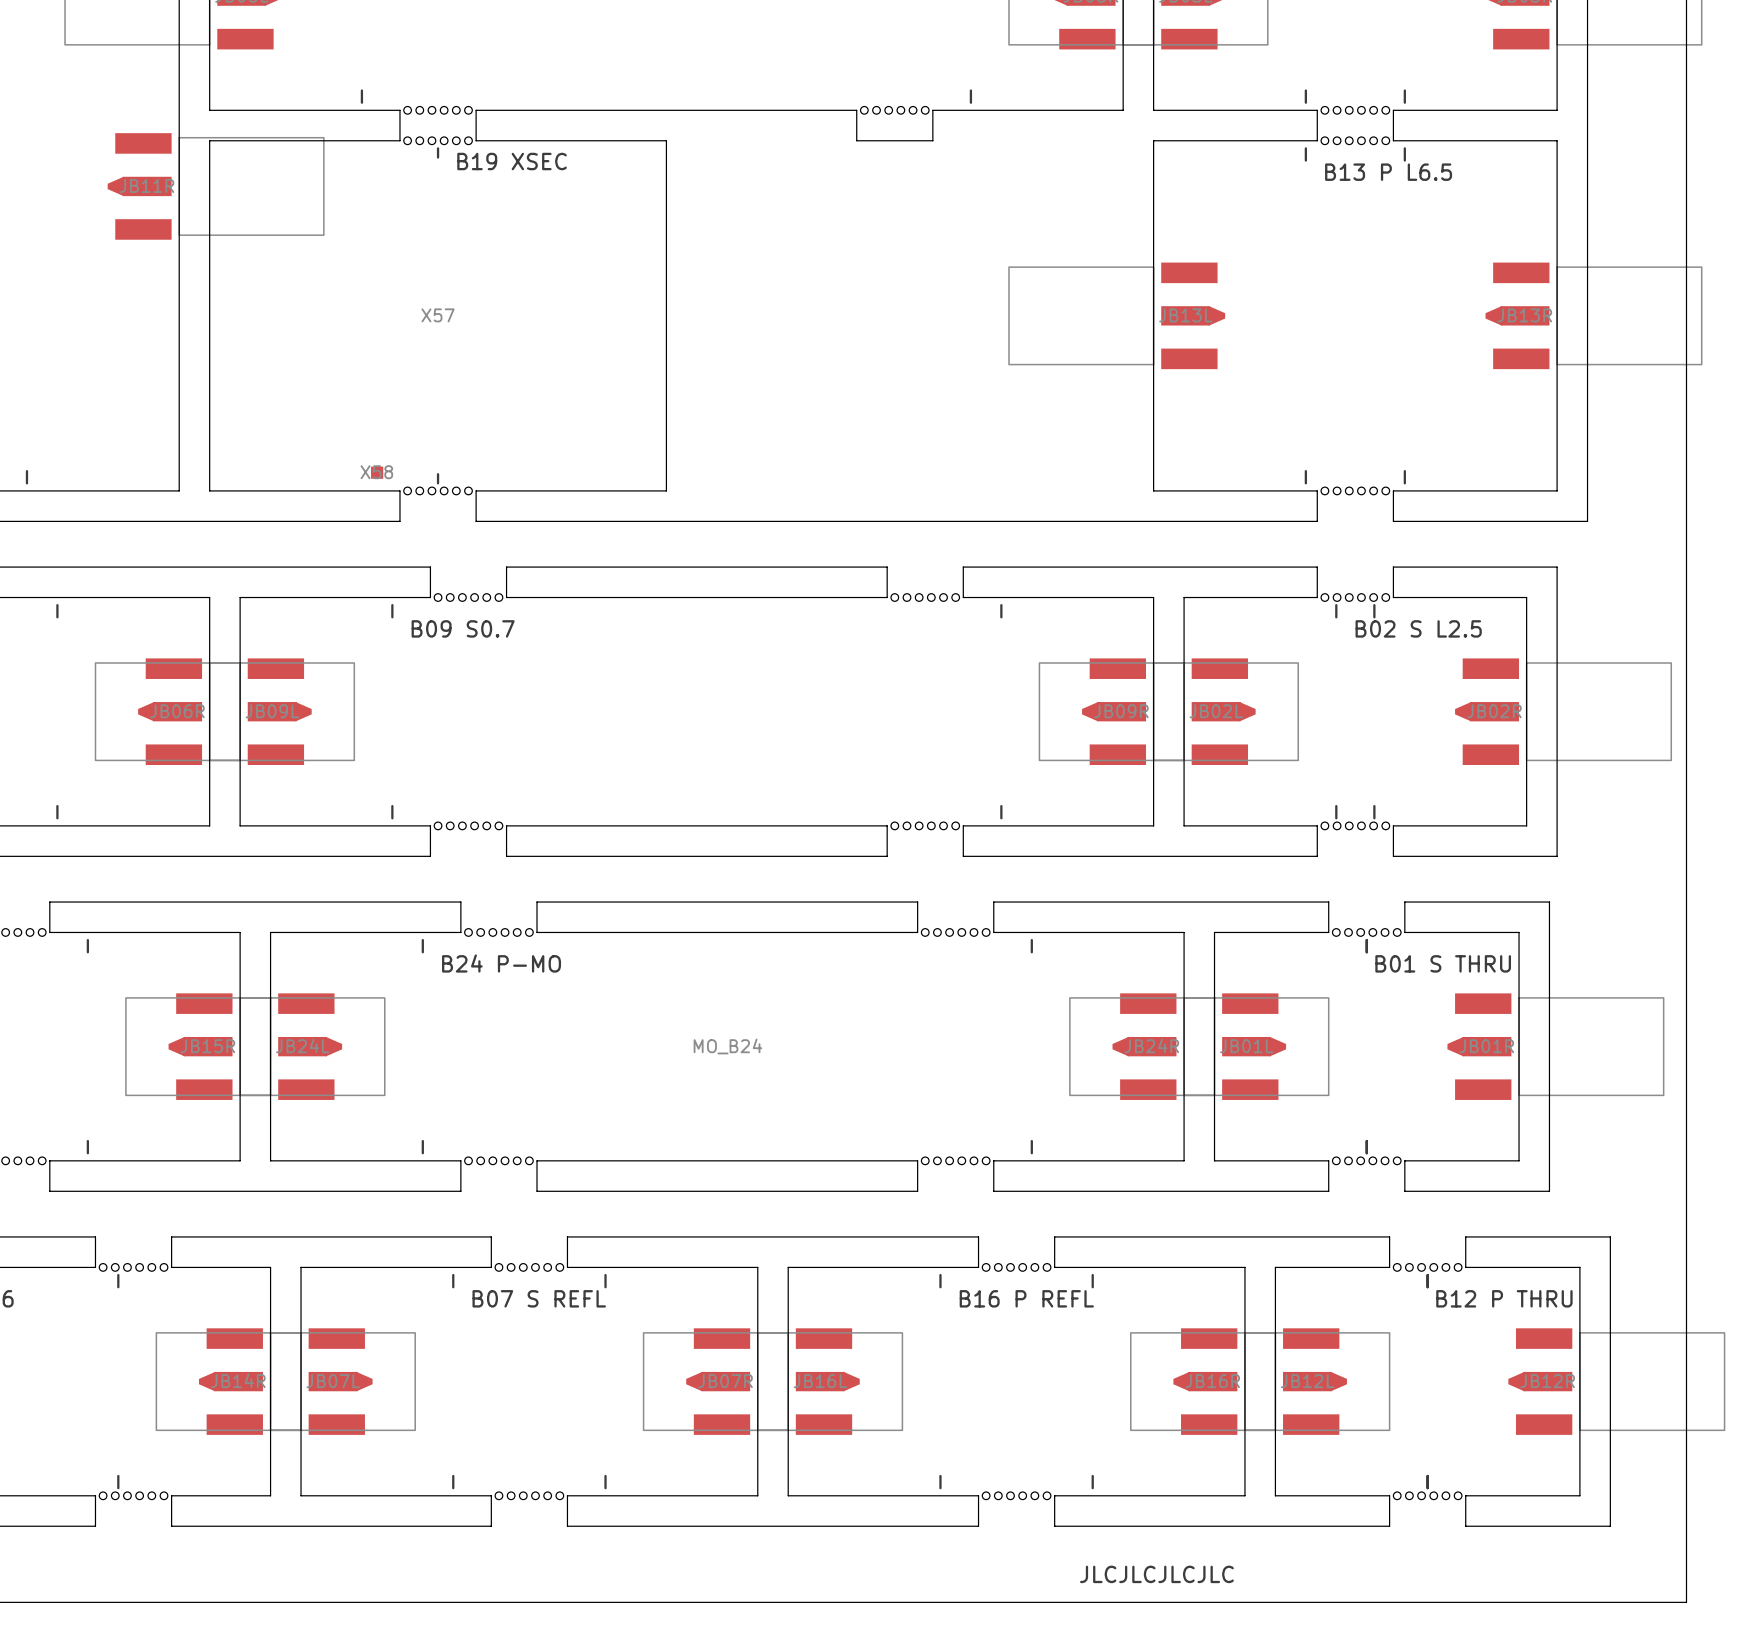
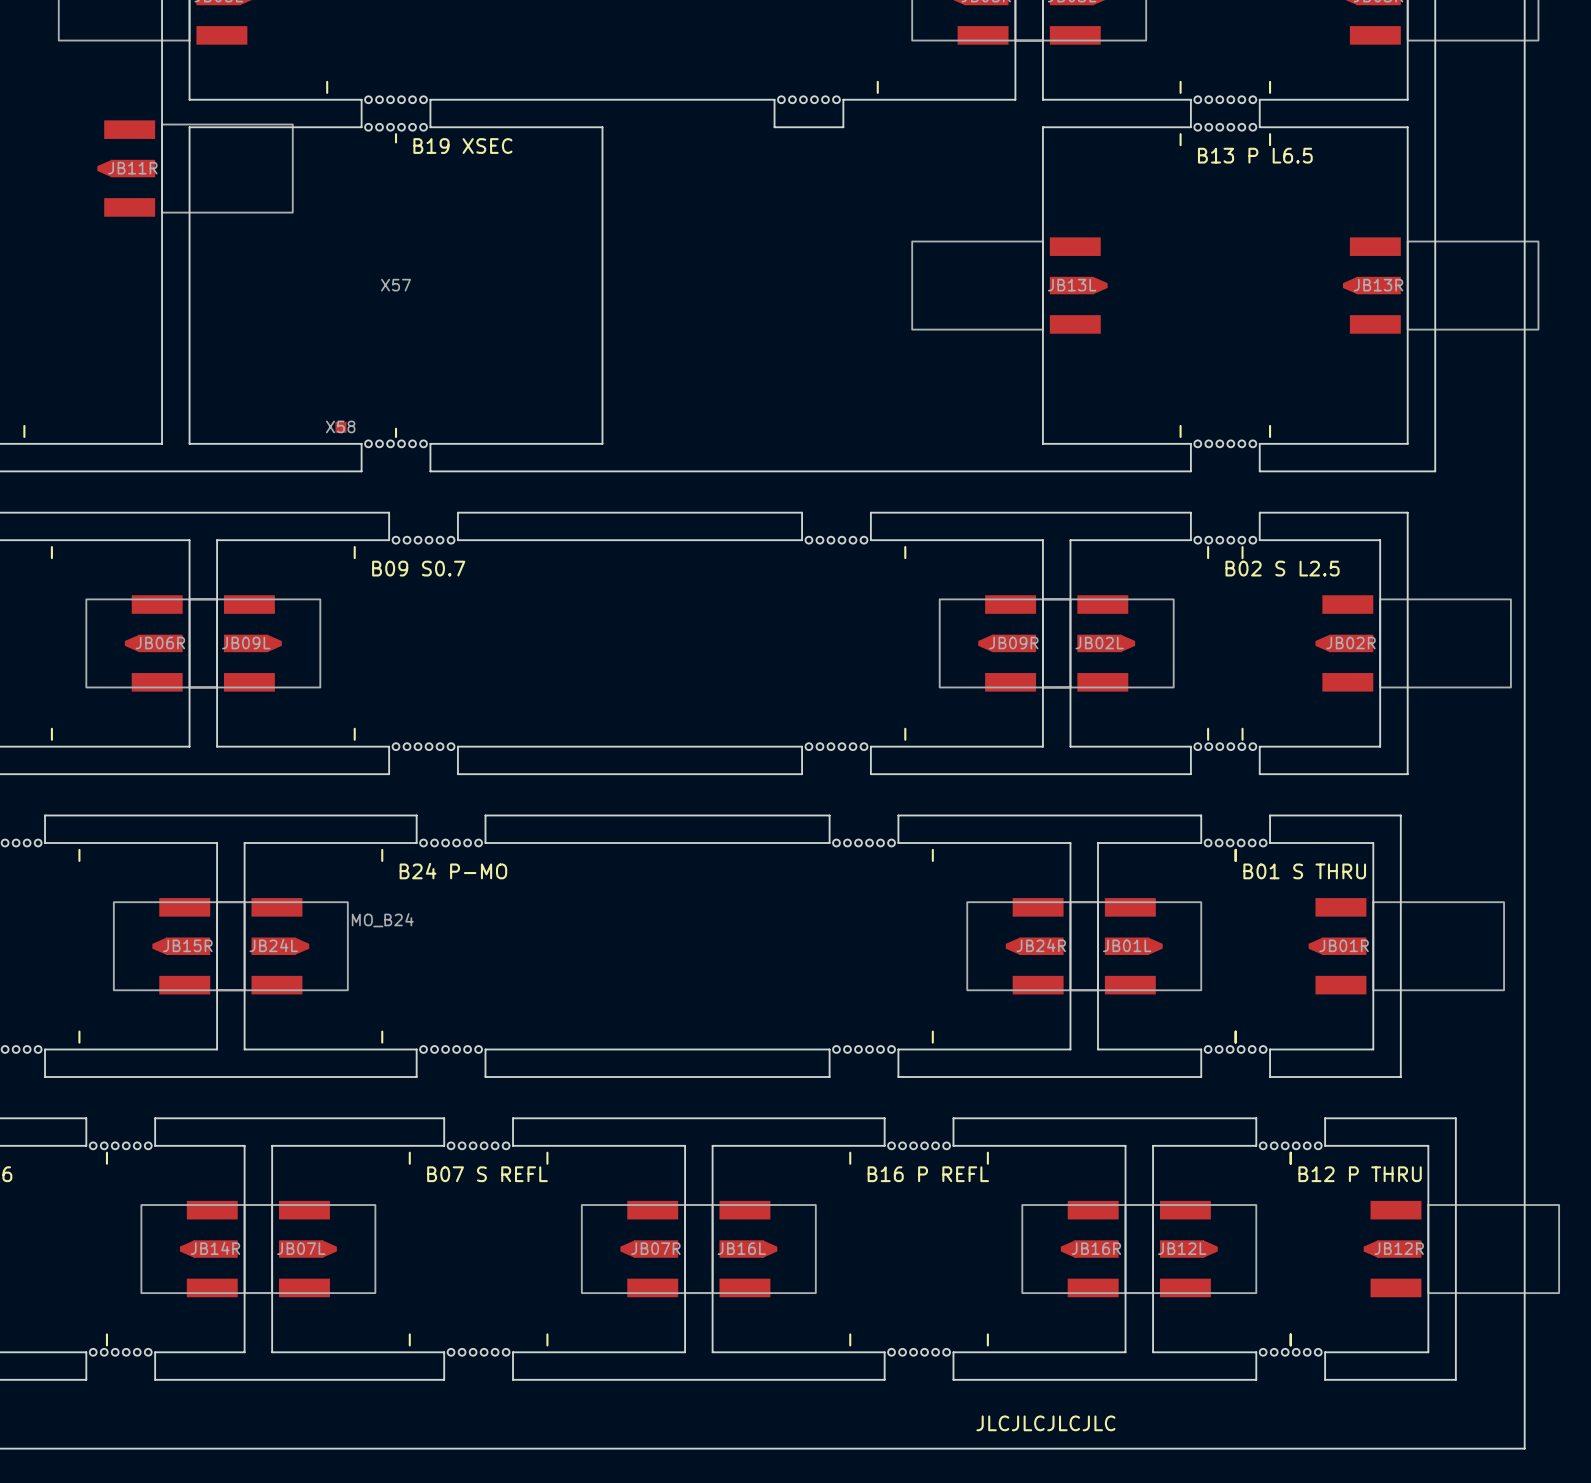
MO_B24 position: (727, 1046) -> (382, 920)

